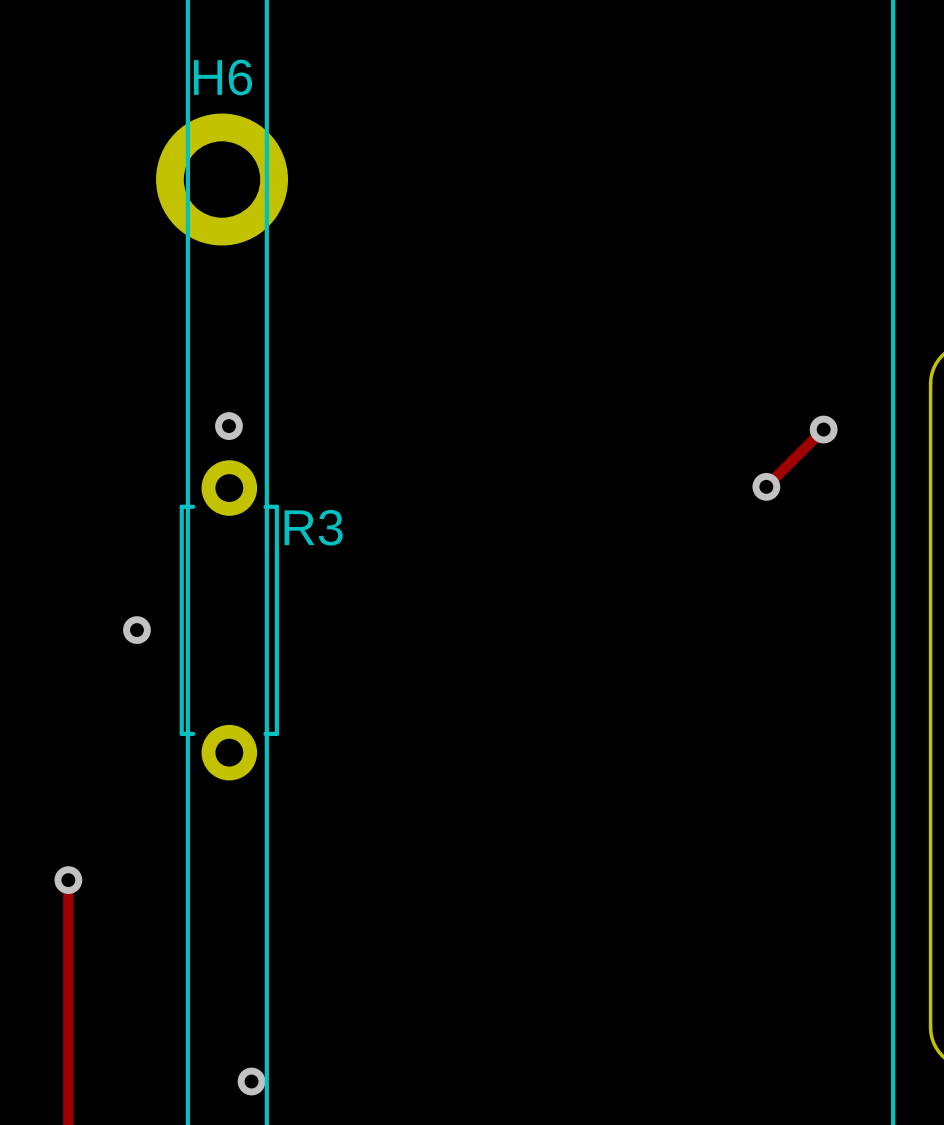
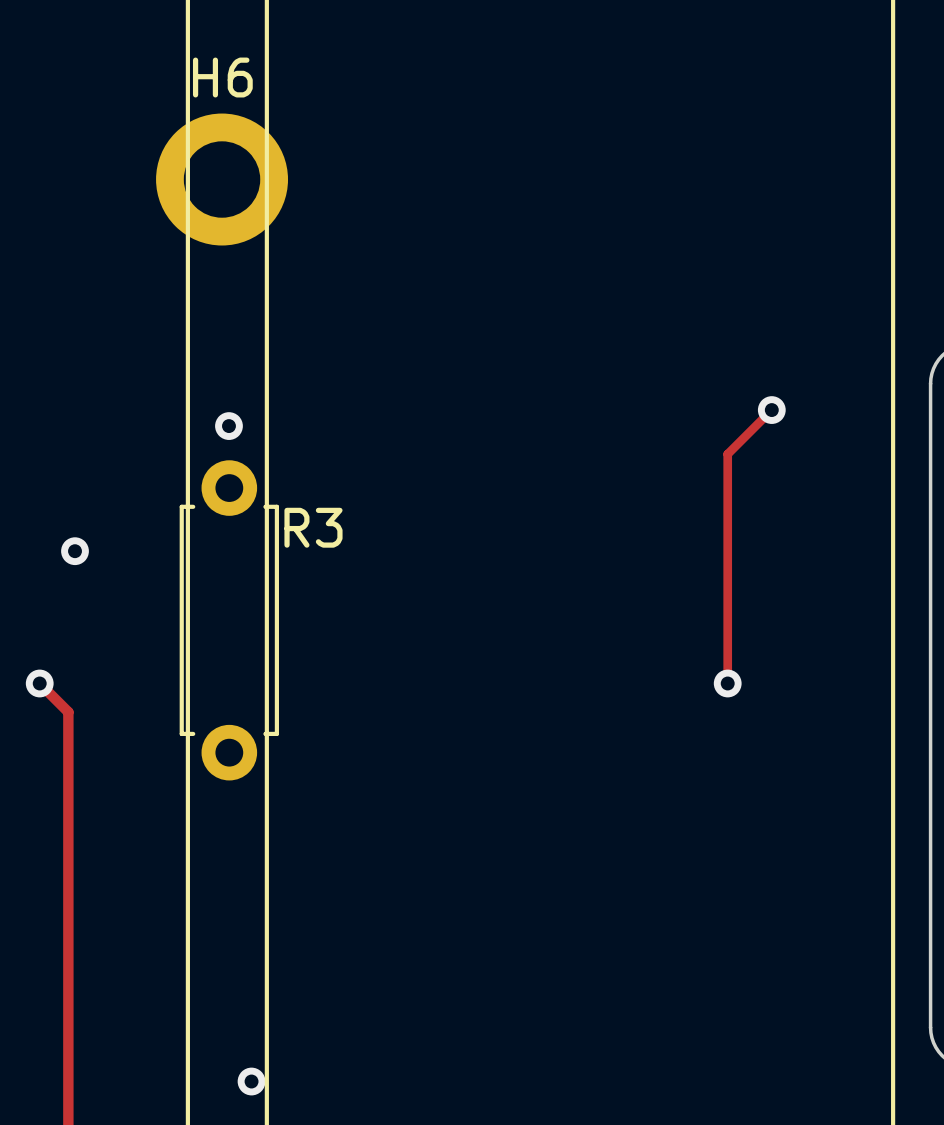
track: none -> (771, 410) (727, 454) (727, 683)
via: none -> (771, 410)
track: (823, 429) (766, 486) -> none
via: (823, 429) -> none
via: (766, 486) -> none
via: none -> (75, 551)
via: (136, 630) -> none
track: none -> (39, 683) (68, 712) (68, 880)
via: none -> (39, 683)
via: none -> (727, 683)
via: (68, 880) -> none

